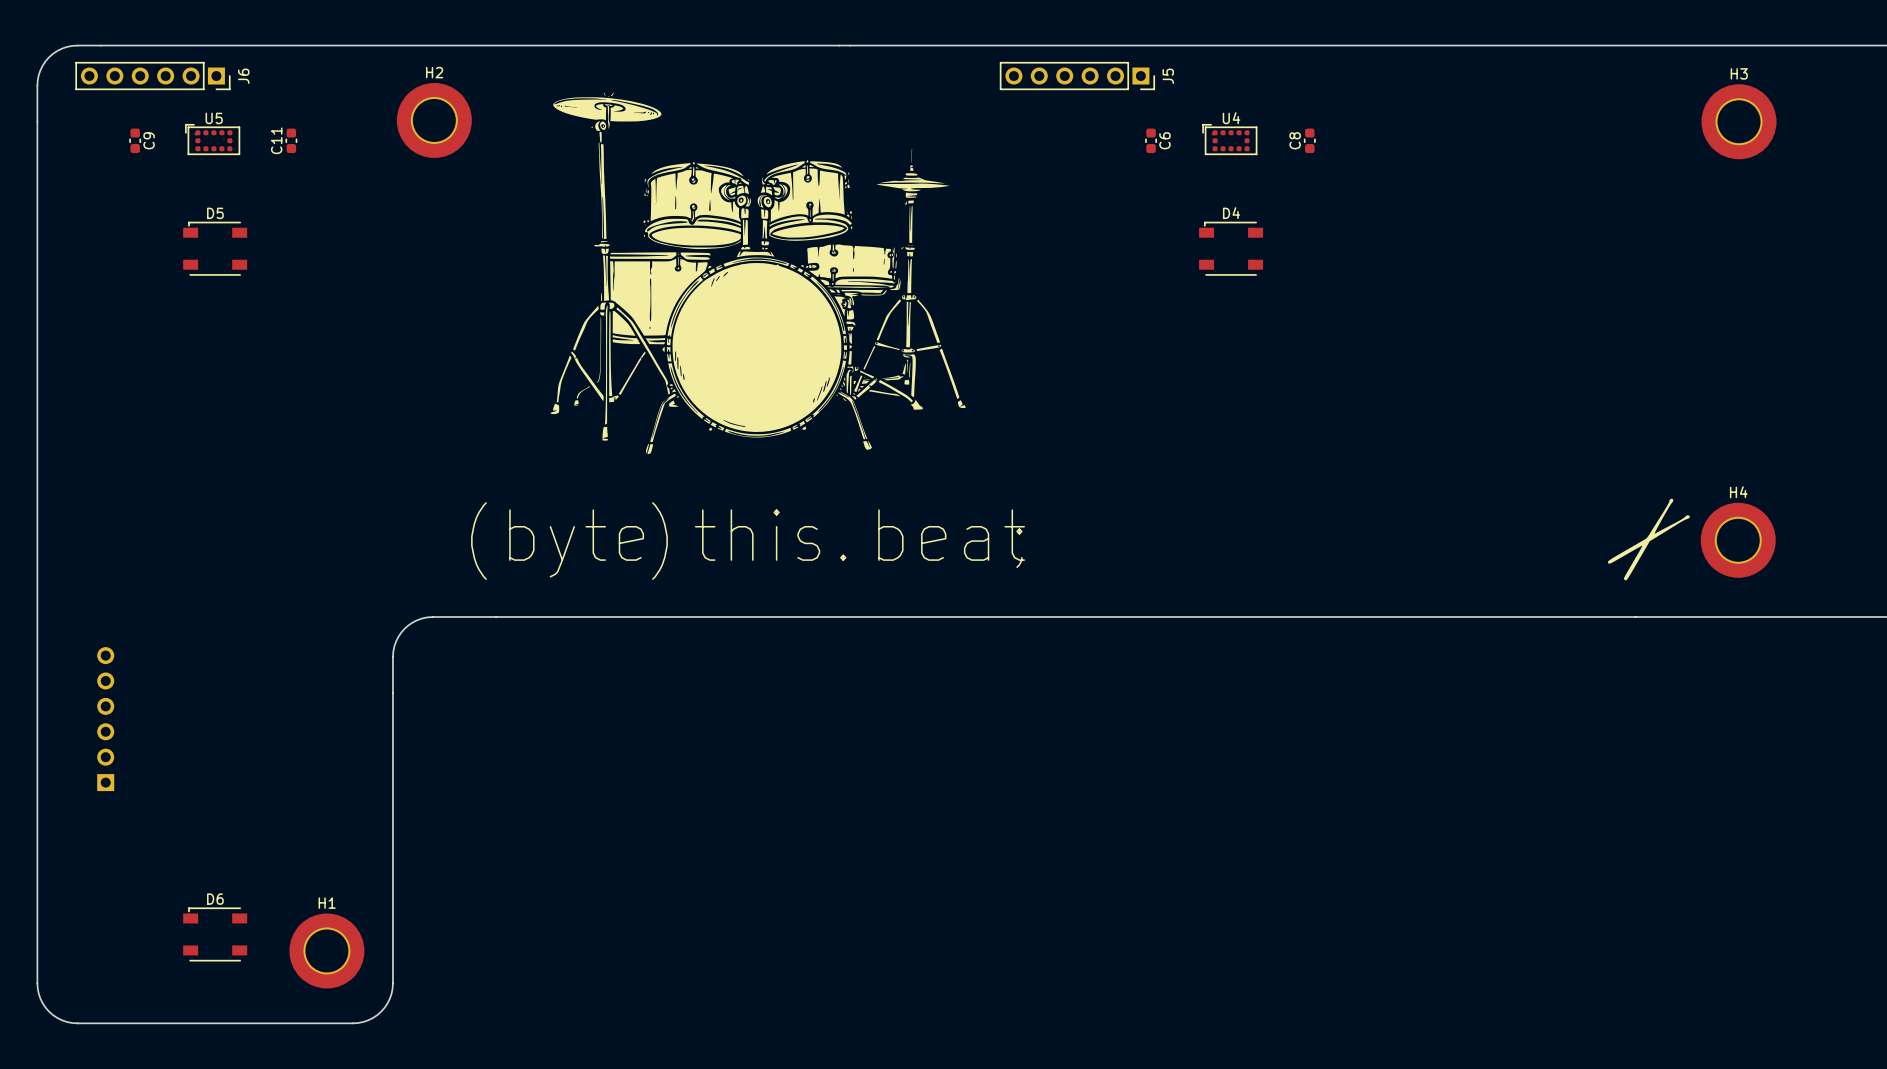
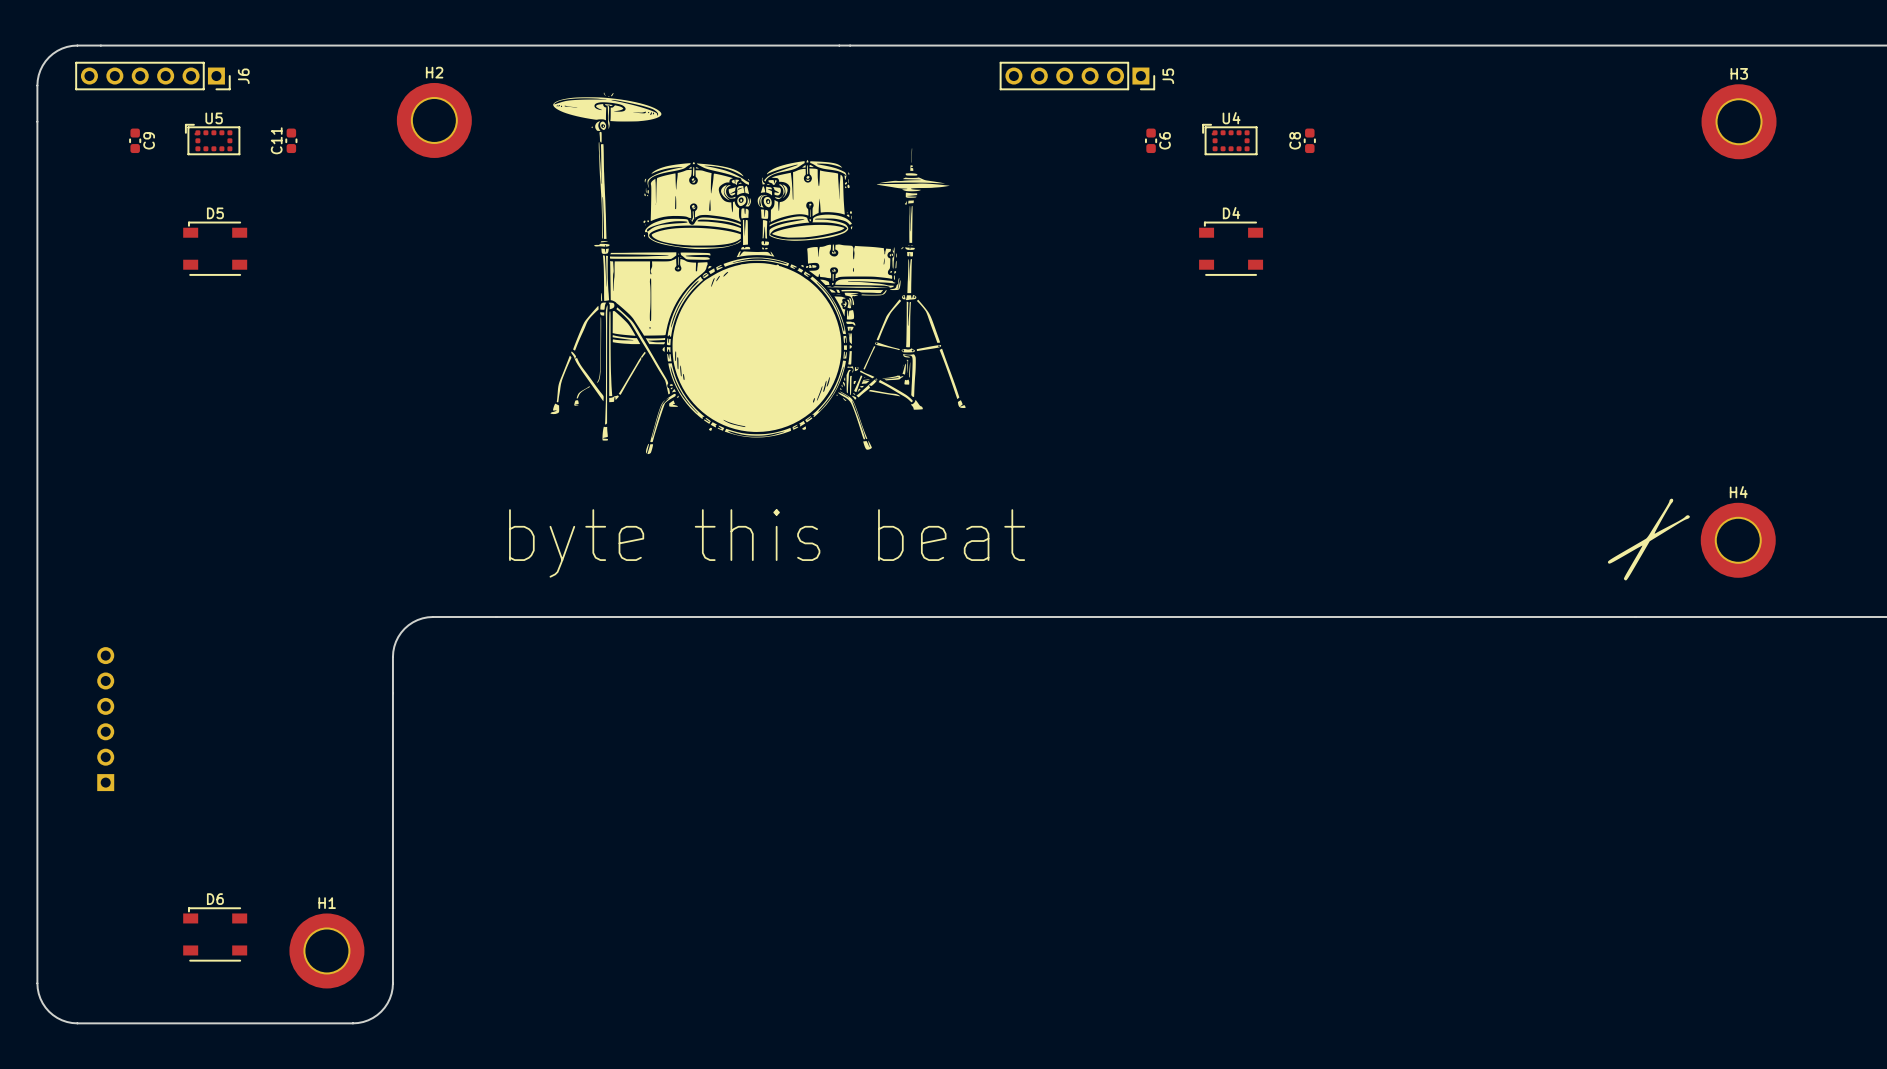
text: ( ) . ; (746, 541) -> none

